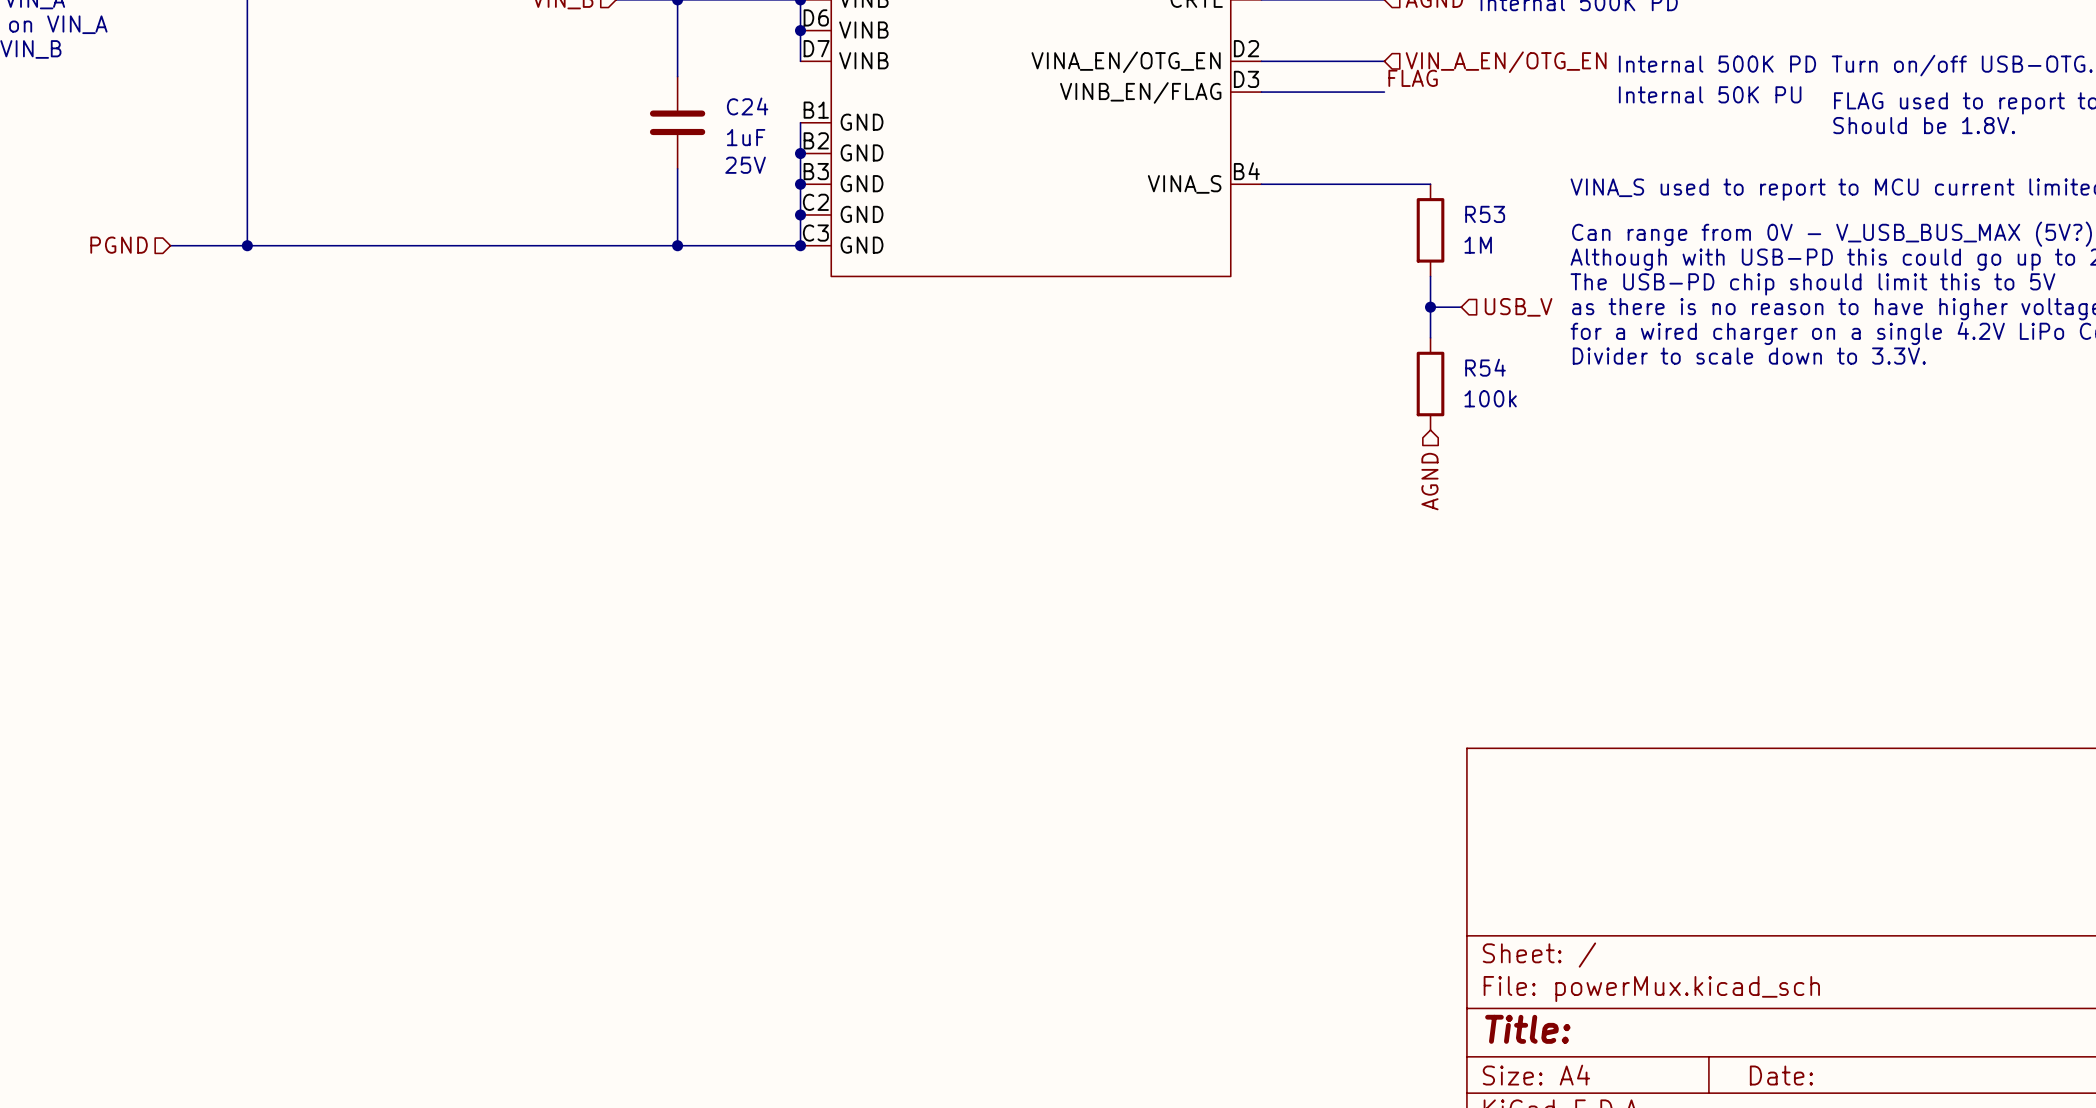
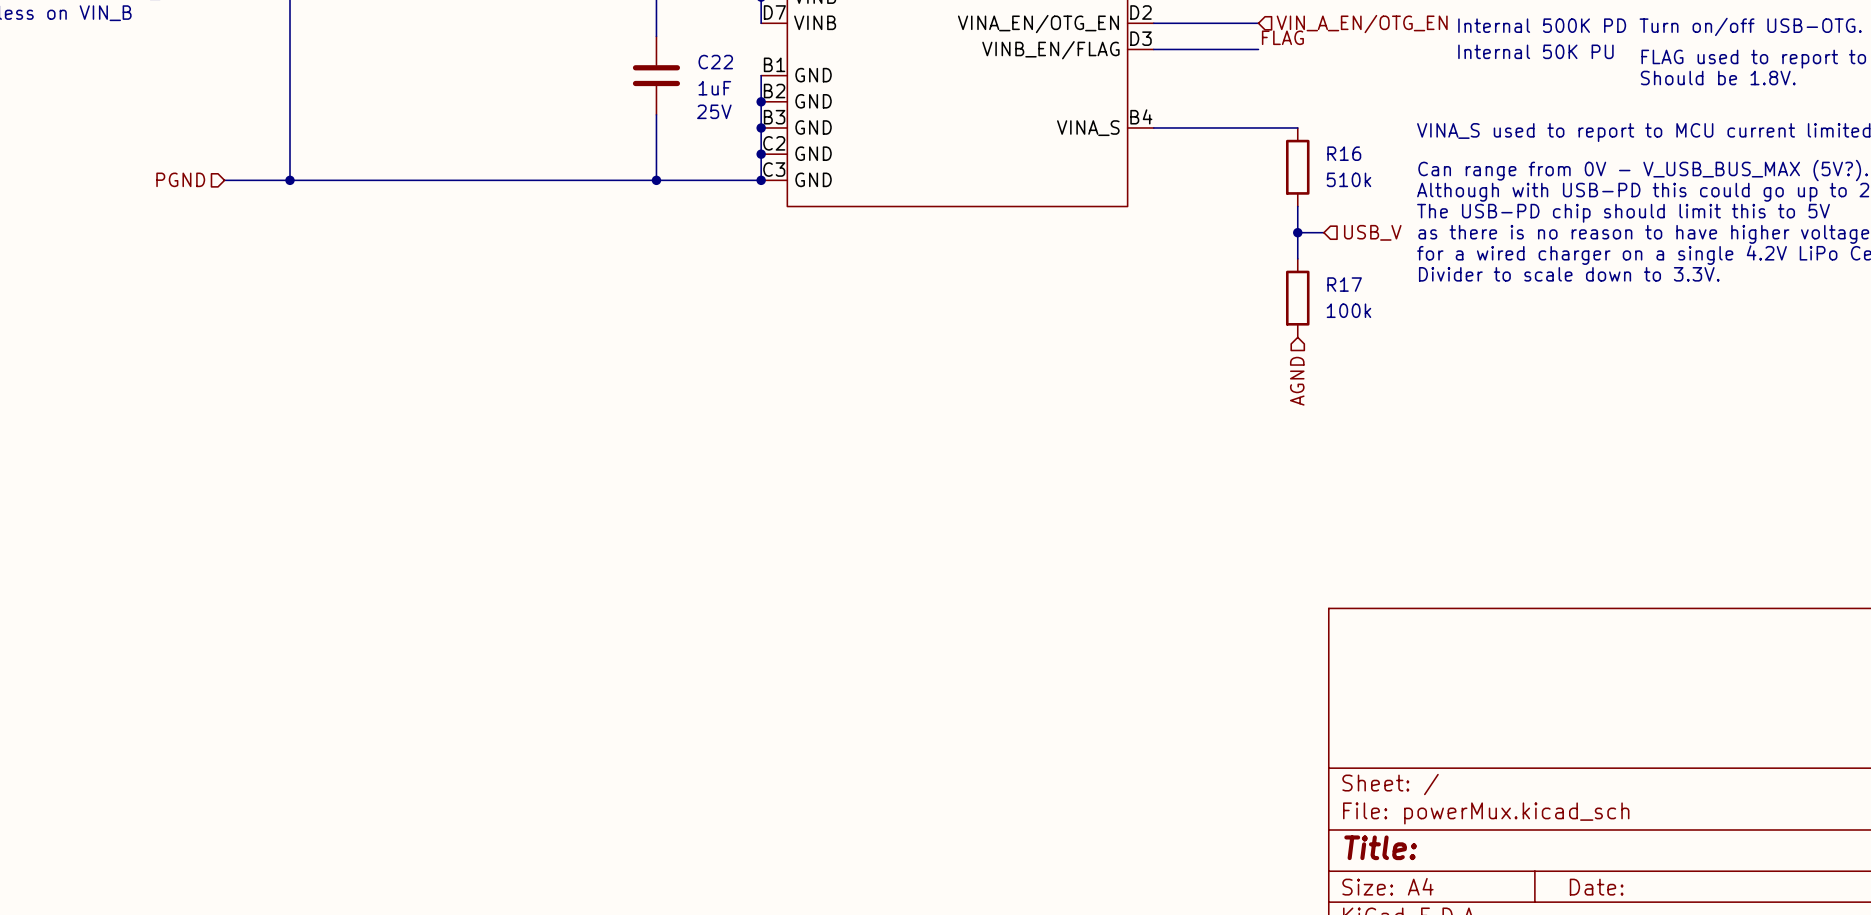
C24 name: C24 (747, 106) -> C22 (715, 62)
R53 name: R53 (1485, 214) -> R16 (1344, 153)
R53 value: 1M (1478, 245) -> 510k (1348, 179)
R54 name: R54 (1485, 367) -> R17 (1344, 284)

